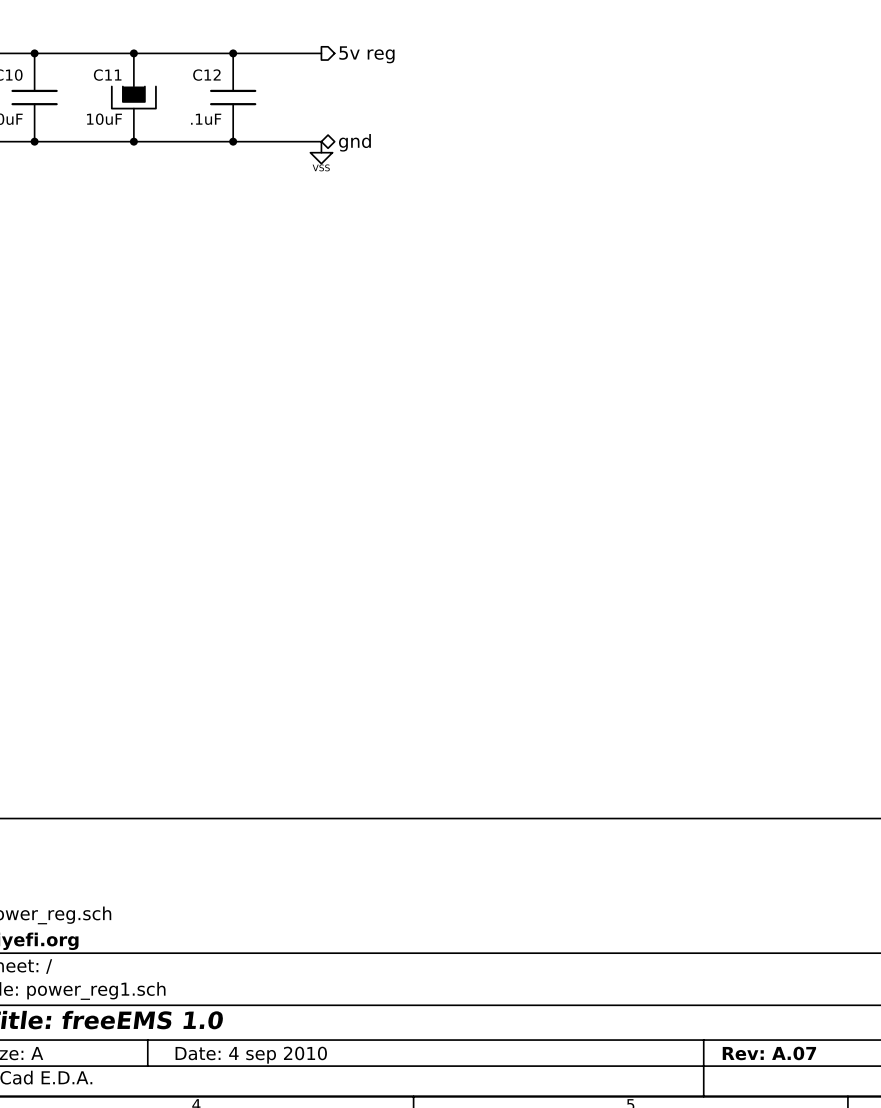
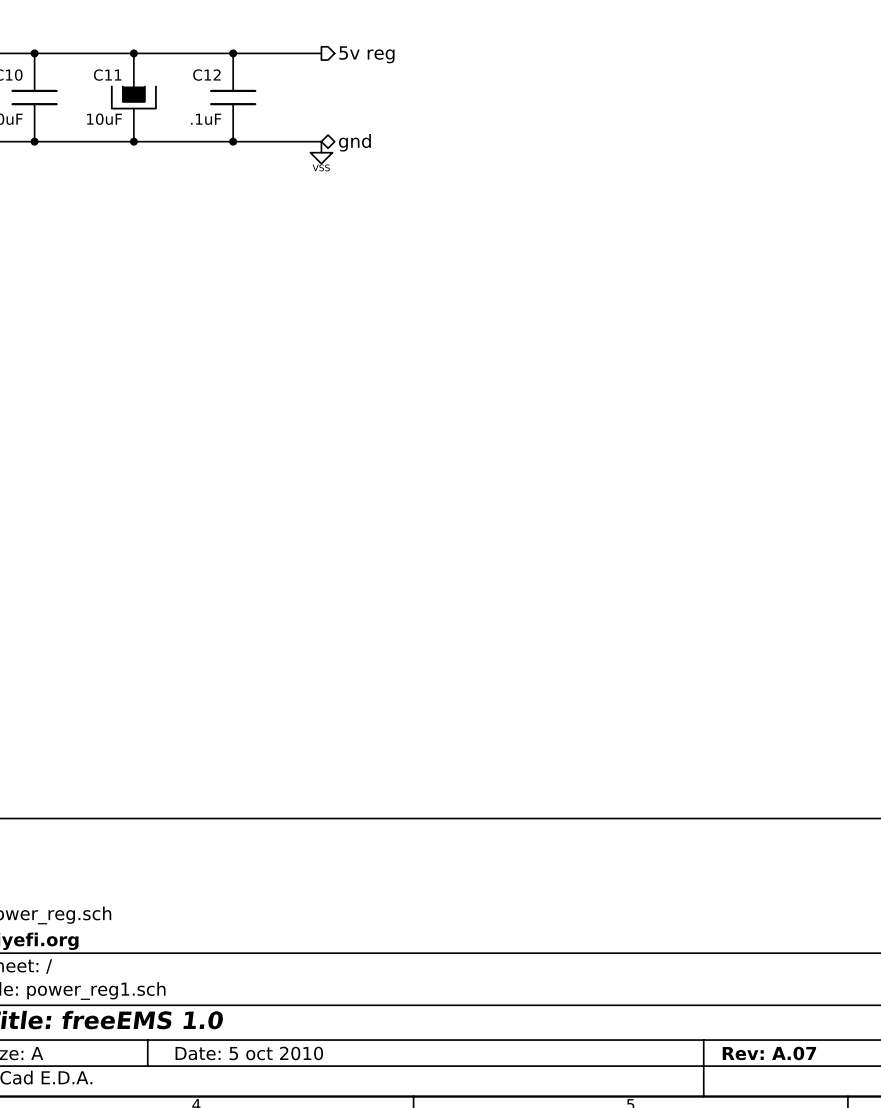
title block: Date: 4 sep 2010 (251, 1055) -> Date: 5 oct 2010 (249, 1053)

